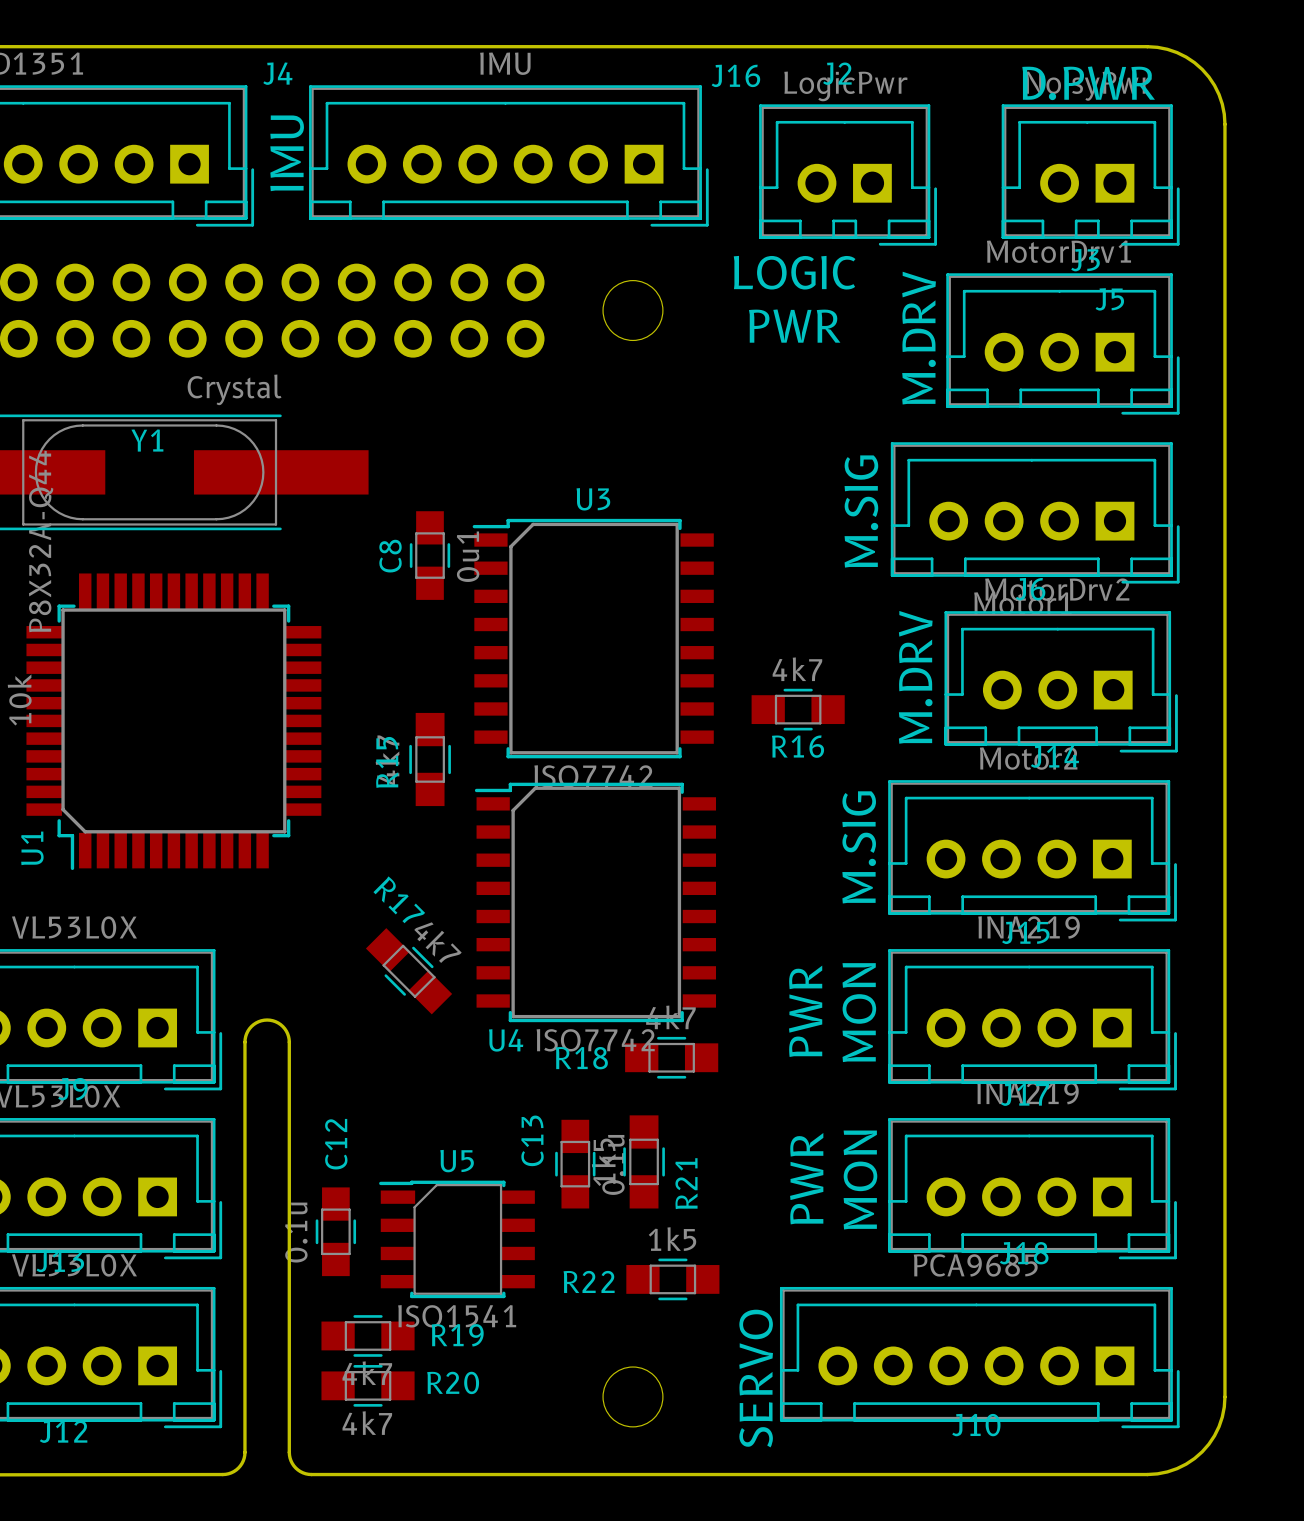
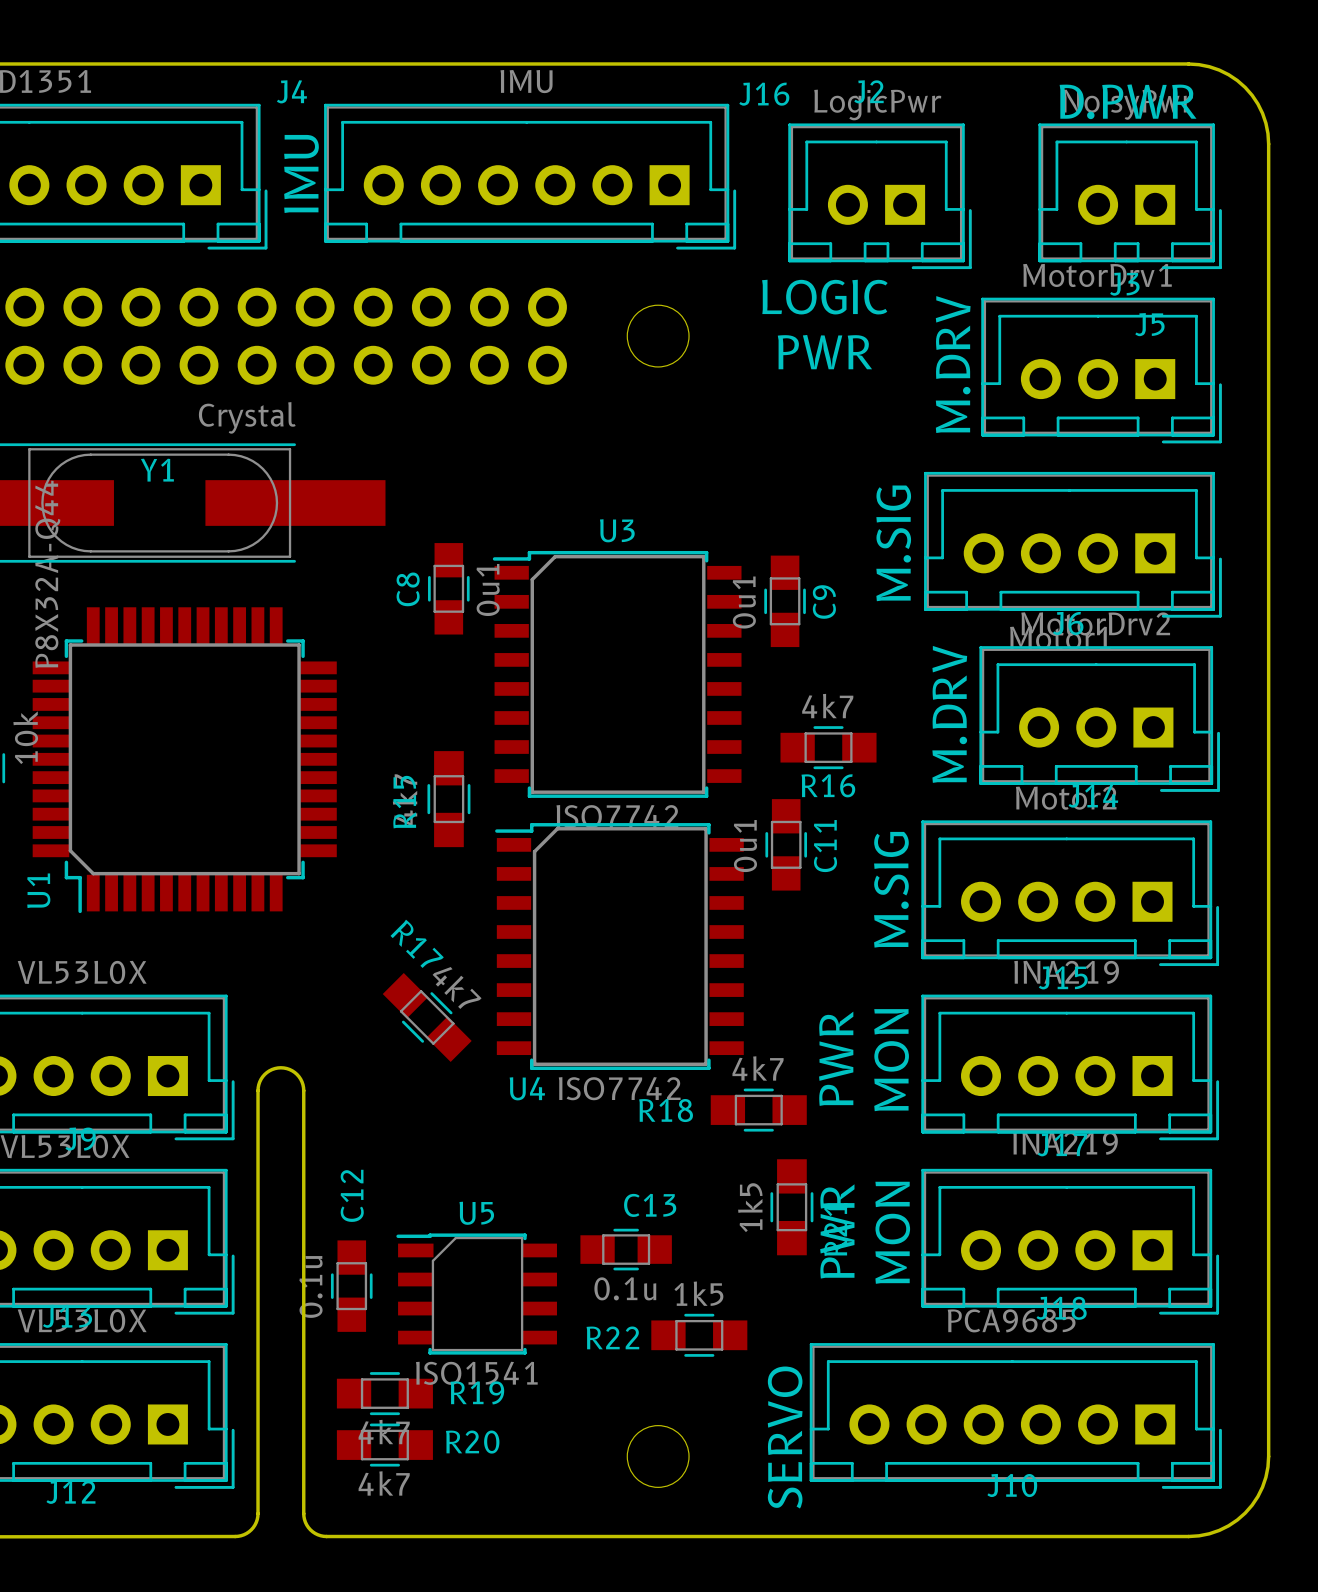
C9: none -> 0u1 (785, 601)
C11: none -> 0u1 (786, 844)
R18 position: (671, 1057) -> (758, 1110)
R21 position: (644, 1161) -> (791, 1207)
C13 rotation: 0° (575, 1164) -> 90° clockwise (626, 1249)

